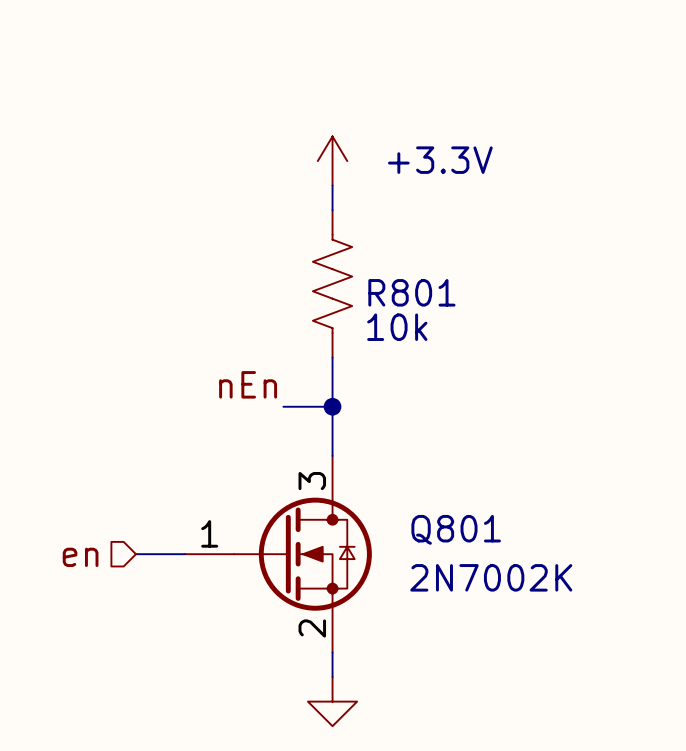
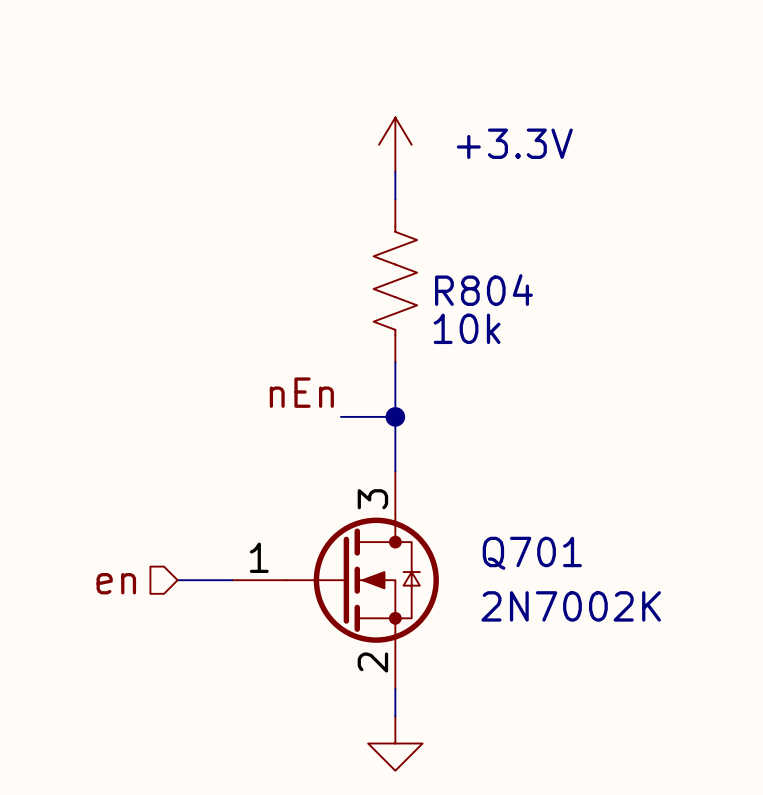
R801 name: R801 (411, 292) -> R804 (483, 290)
Q801 name: Q801 (456, 529) -> Q701 (532, 553)

